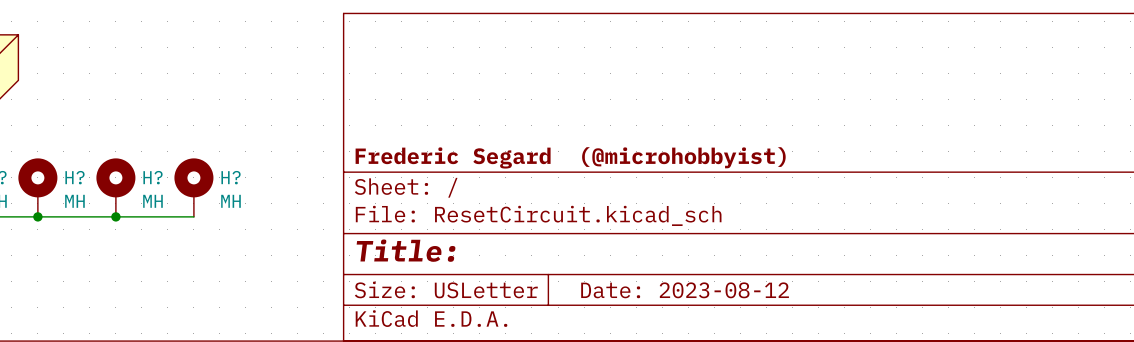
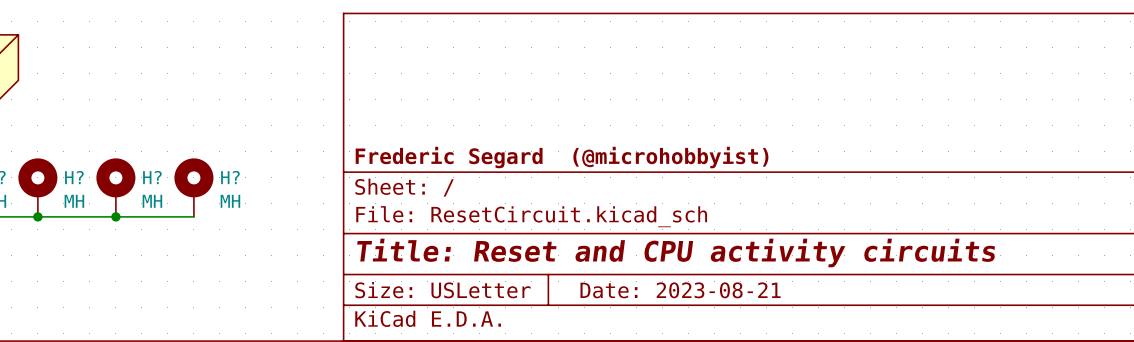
title block: Title: (406, 250) -> Title: Reset and CPU activity circuits (676, 252)
title block: Date: 2023-08-12 (685, 290) -> Date: 2023-08-21 (680, 290)

